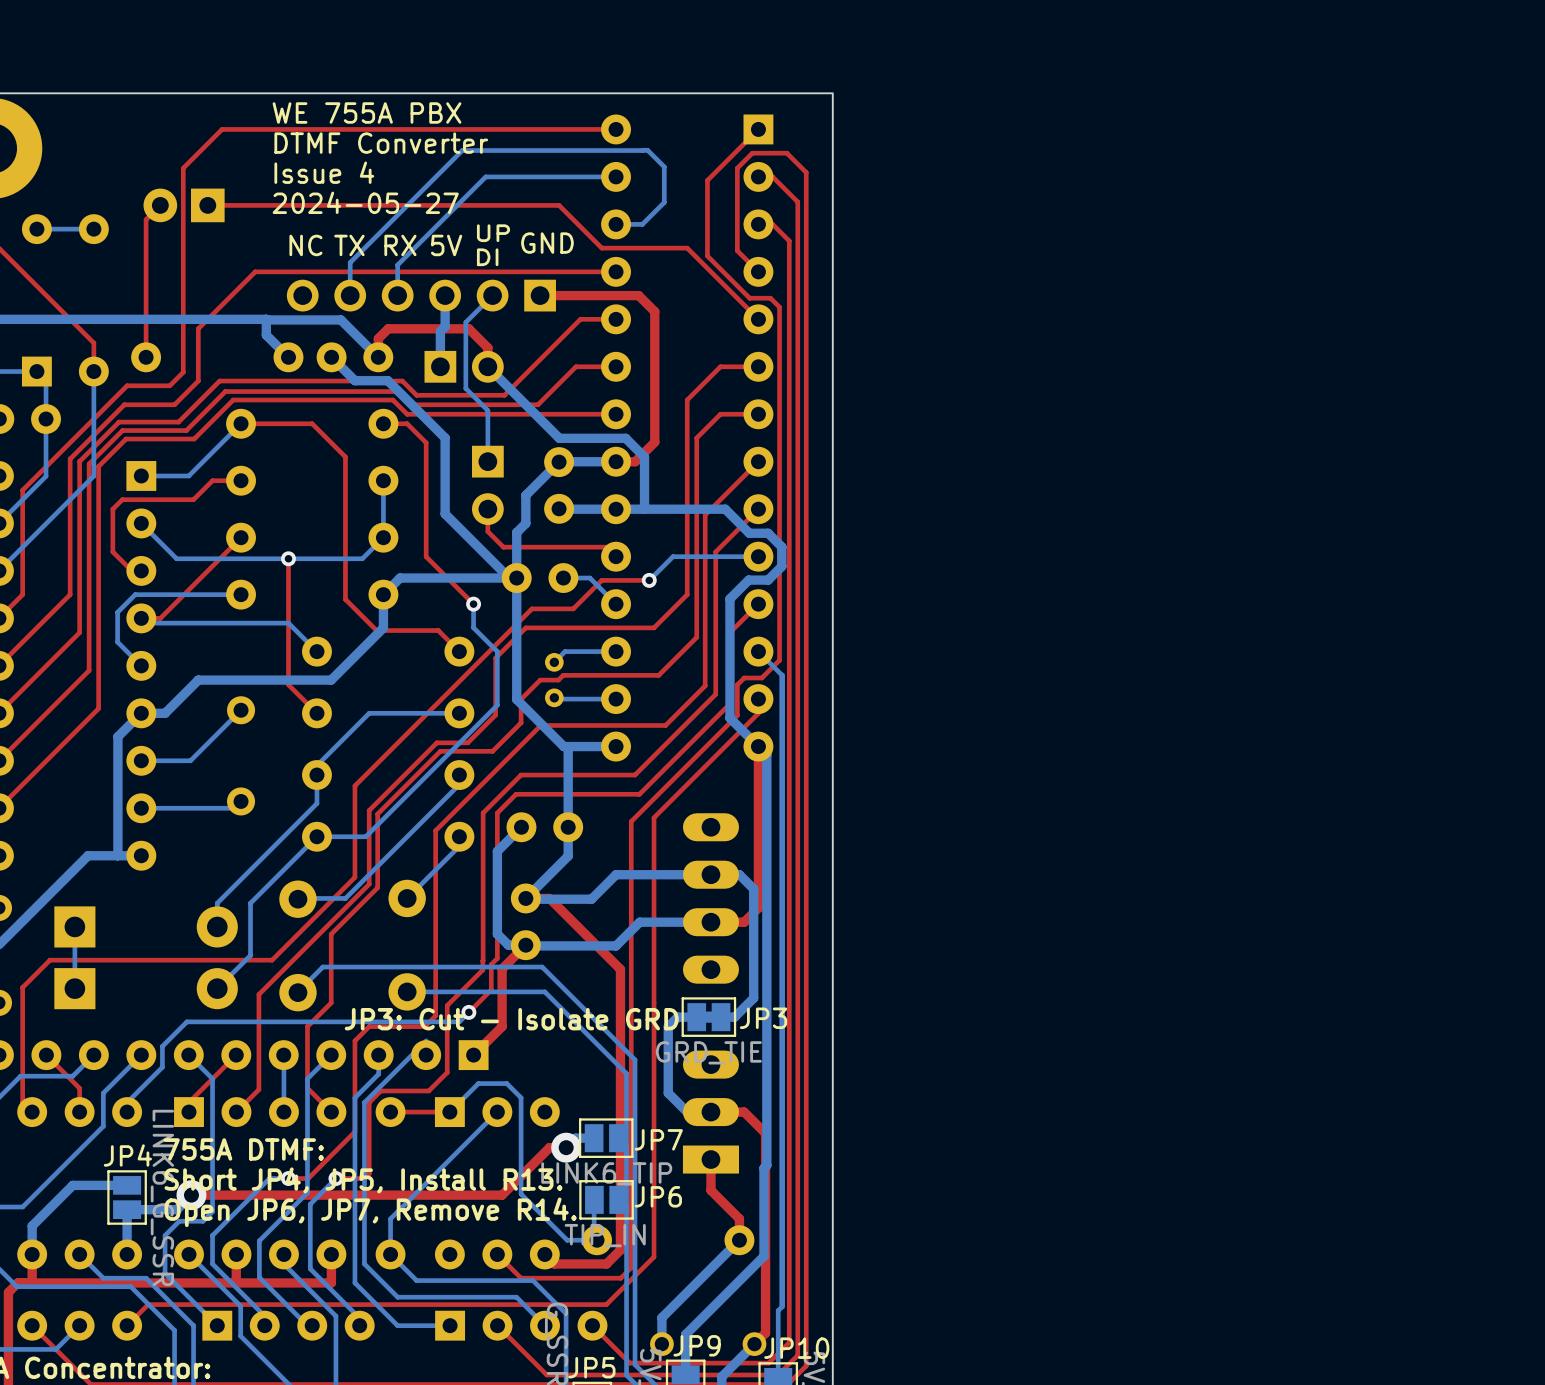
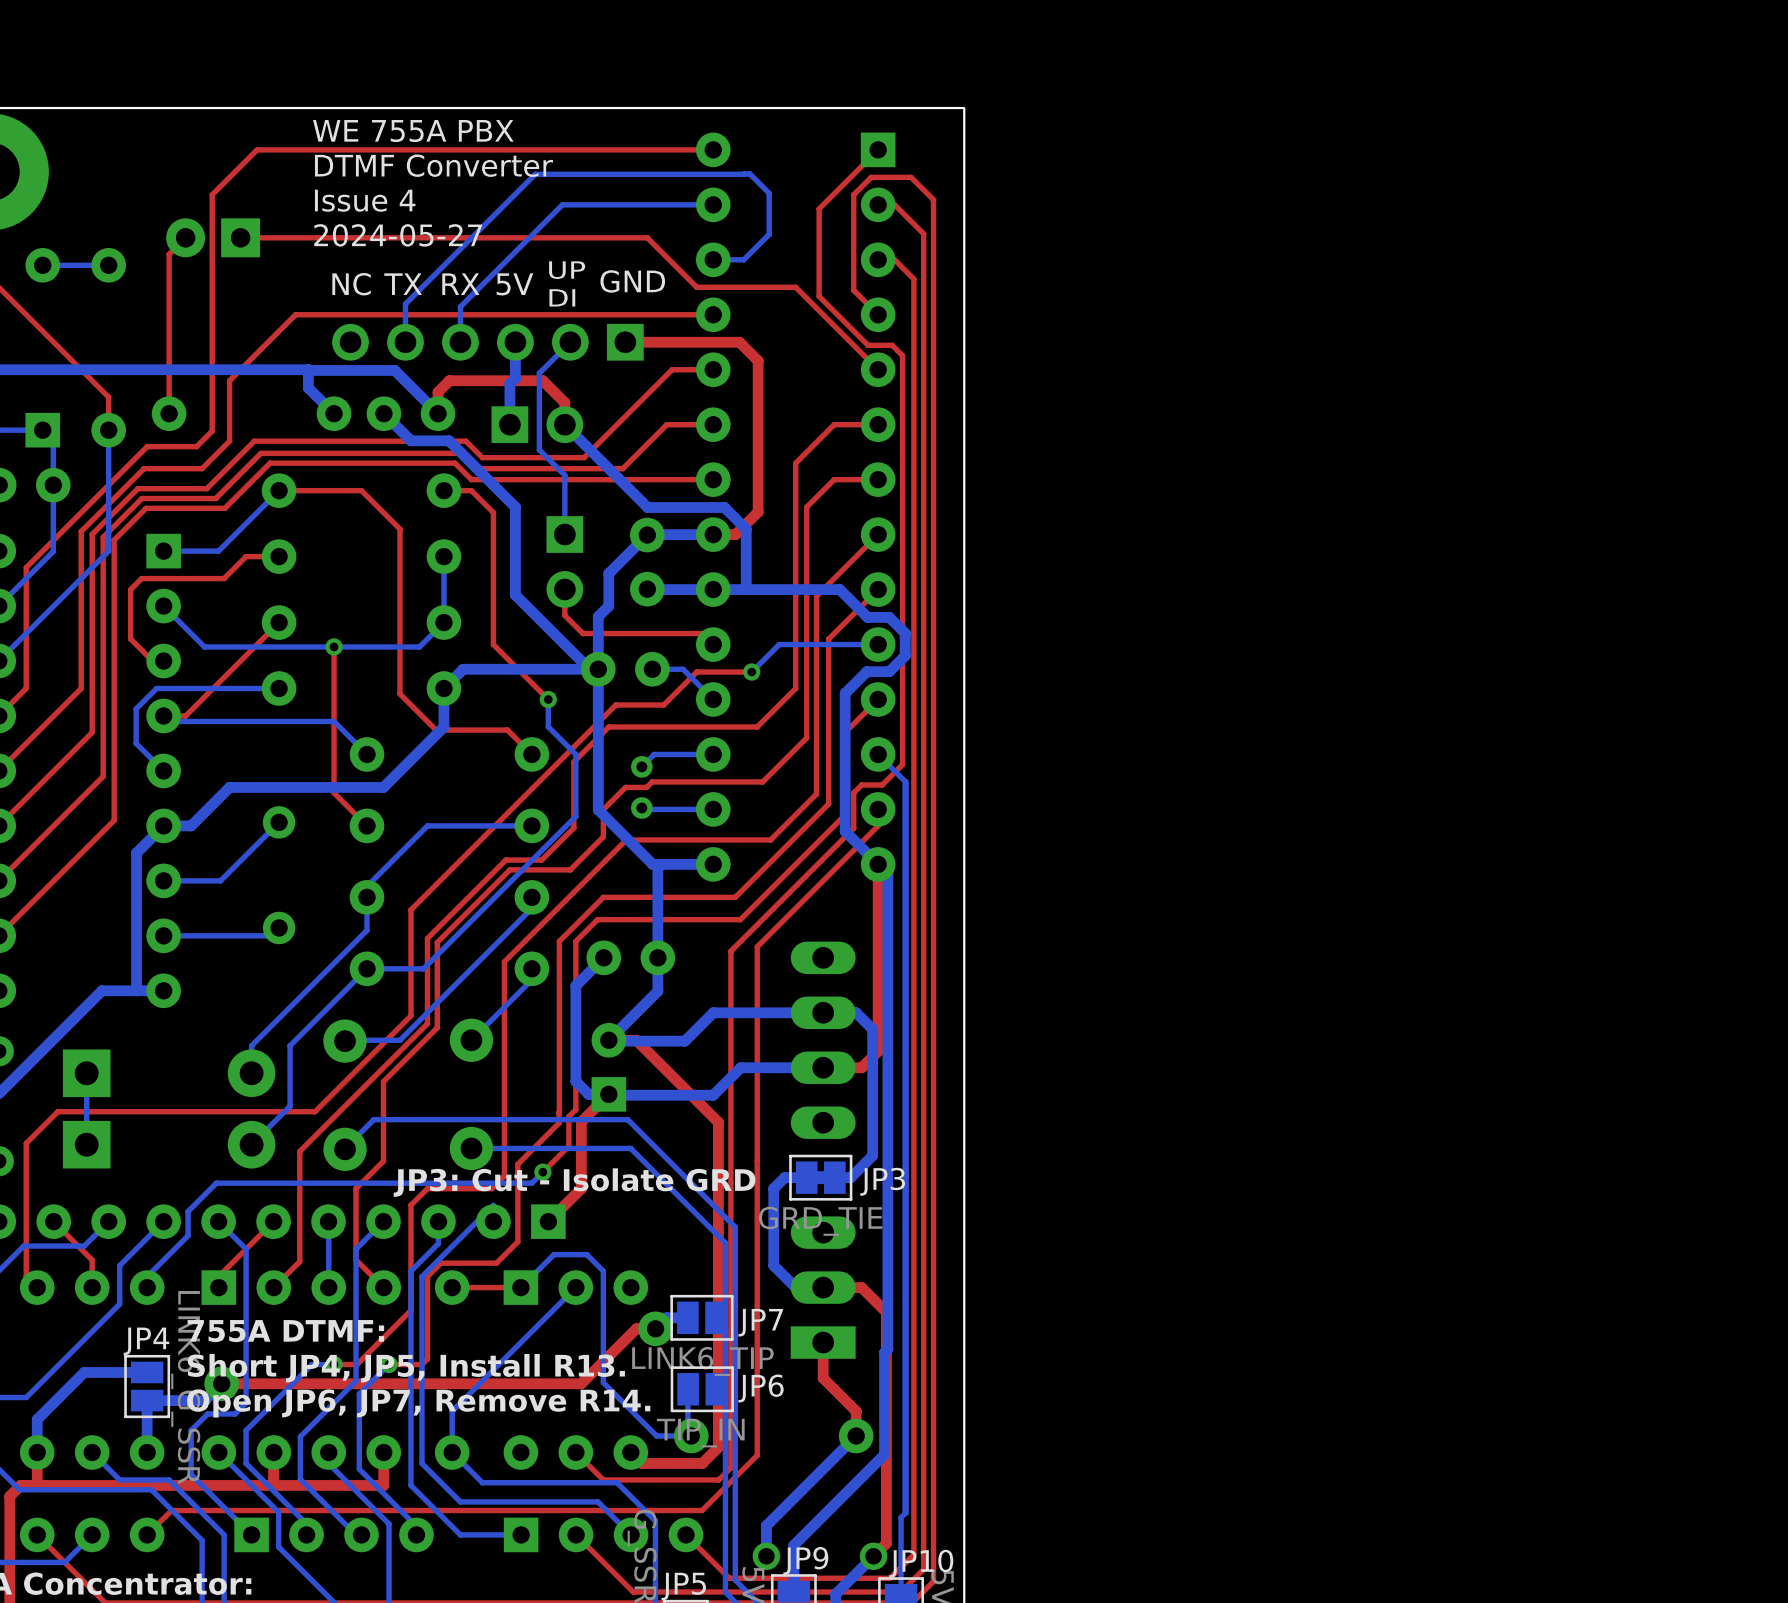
part footprint: [510, 883, 541, 961] -> [591, 1022, 627, 1112]

